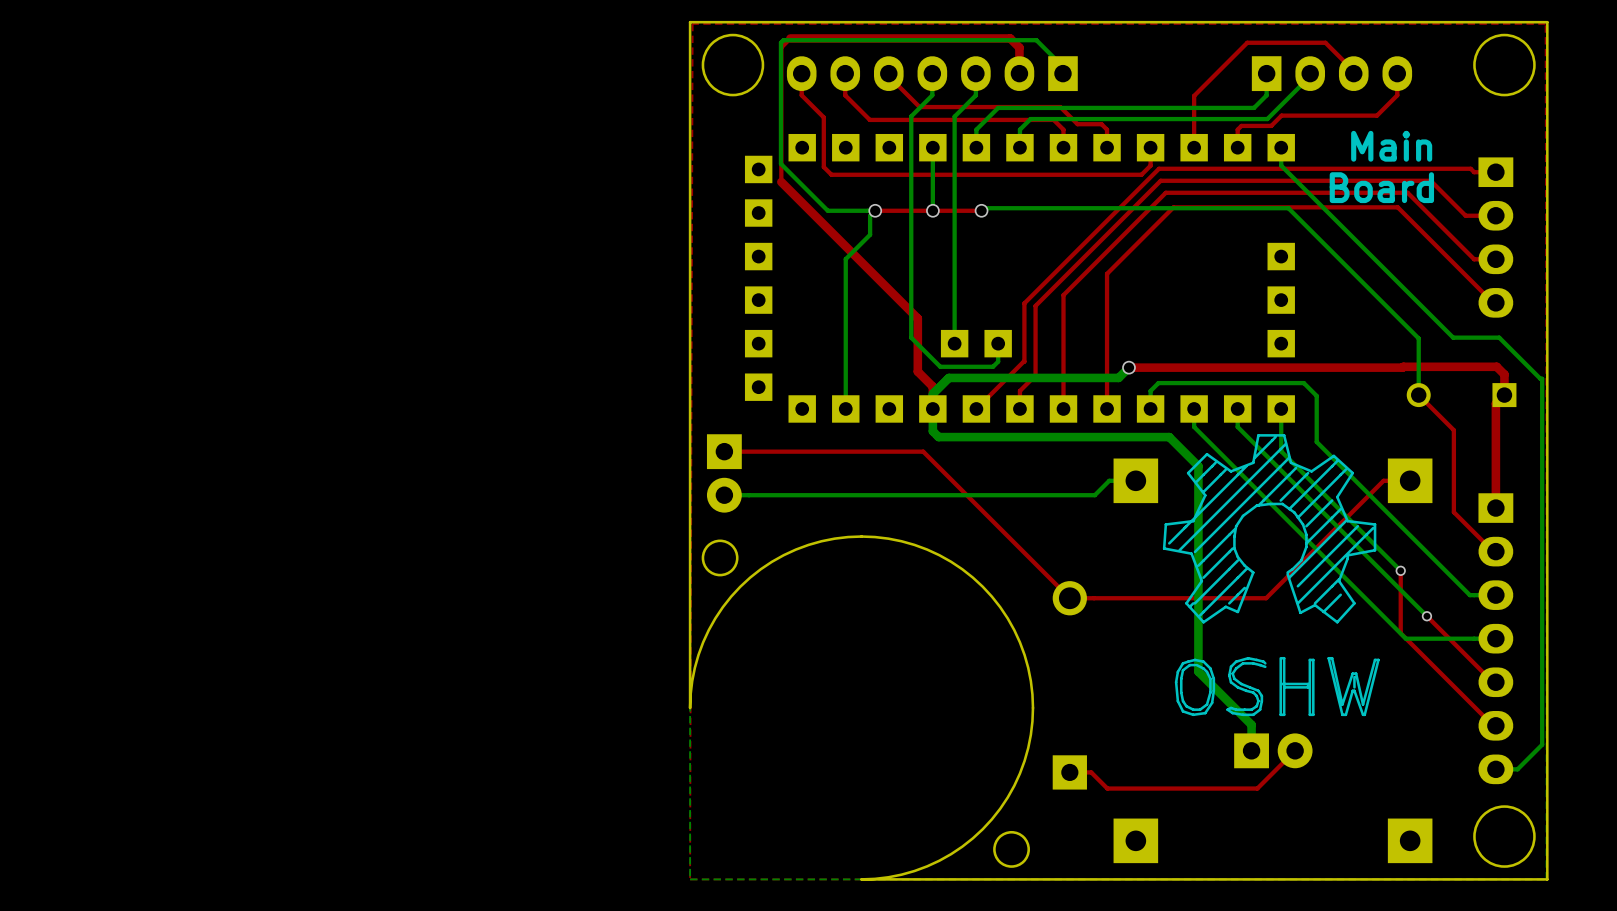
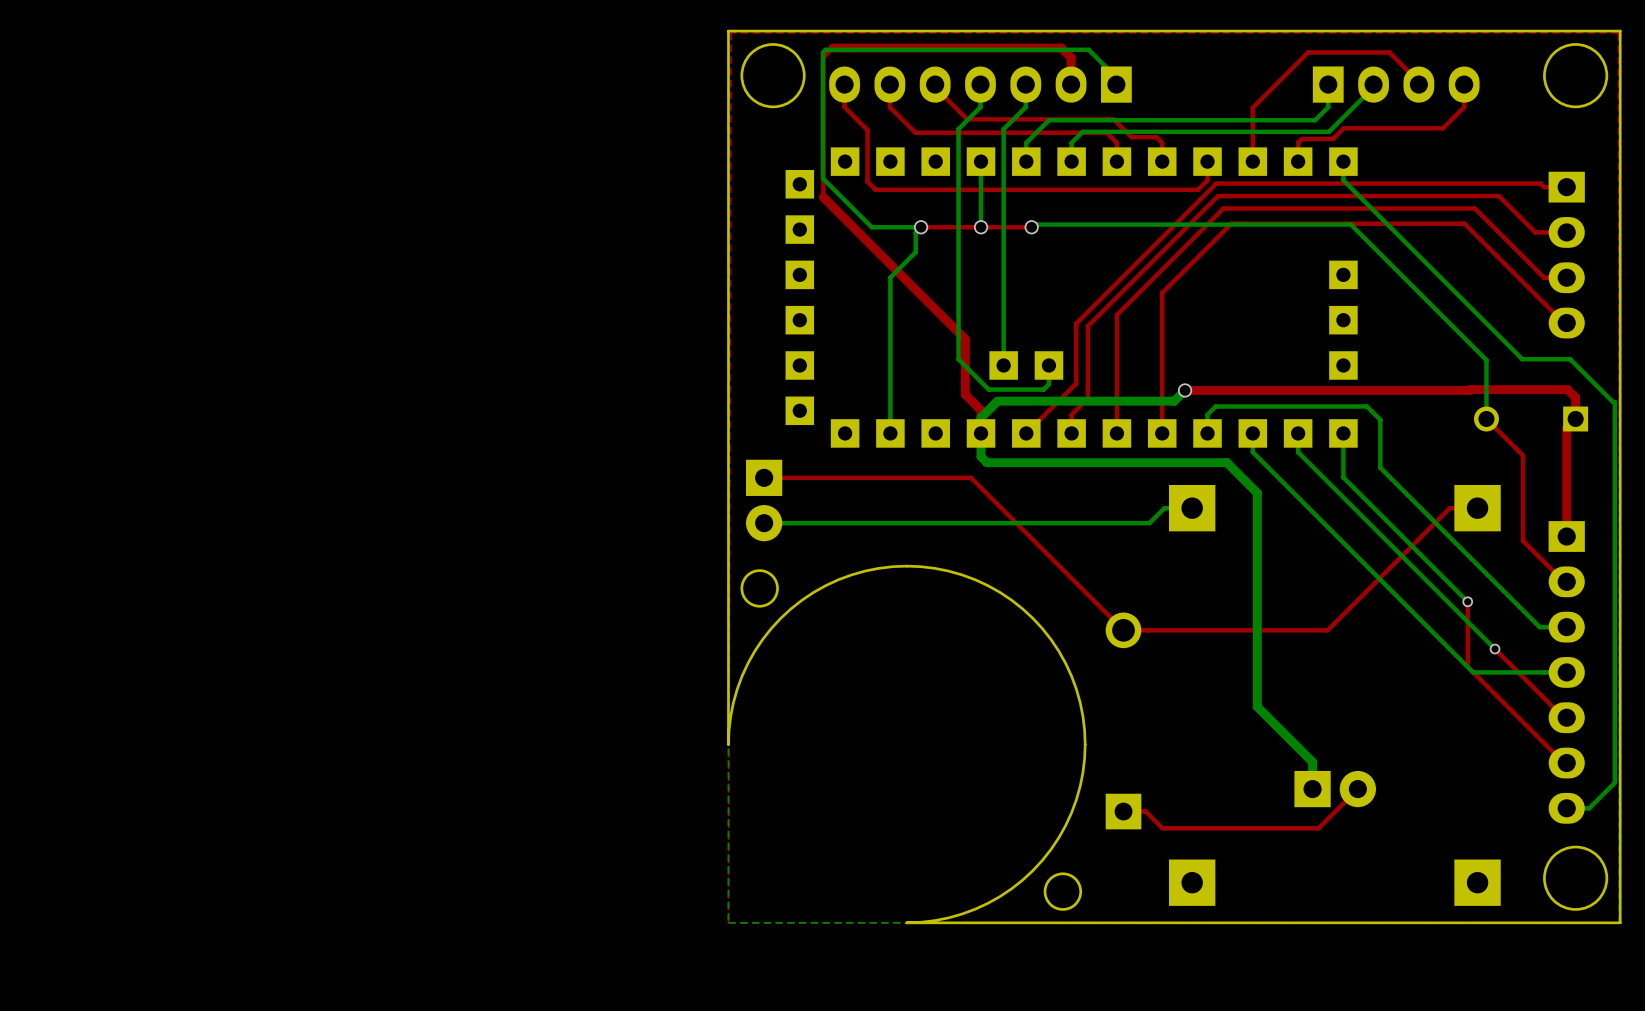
text: Main (1391, 146) -> none
text: Board (1381, 187) -> none
drawing: [1162, 434, 1380, 717] -> none

